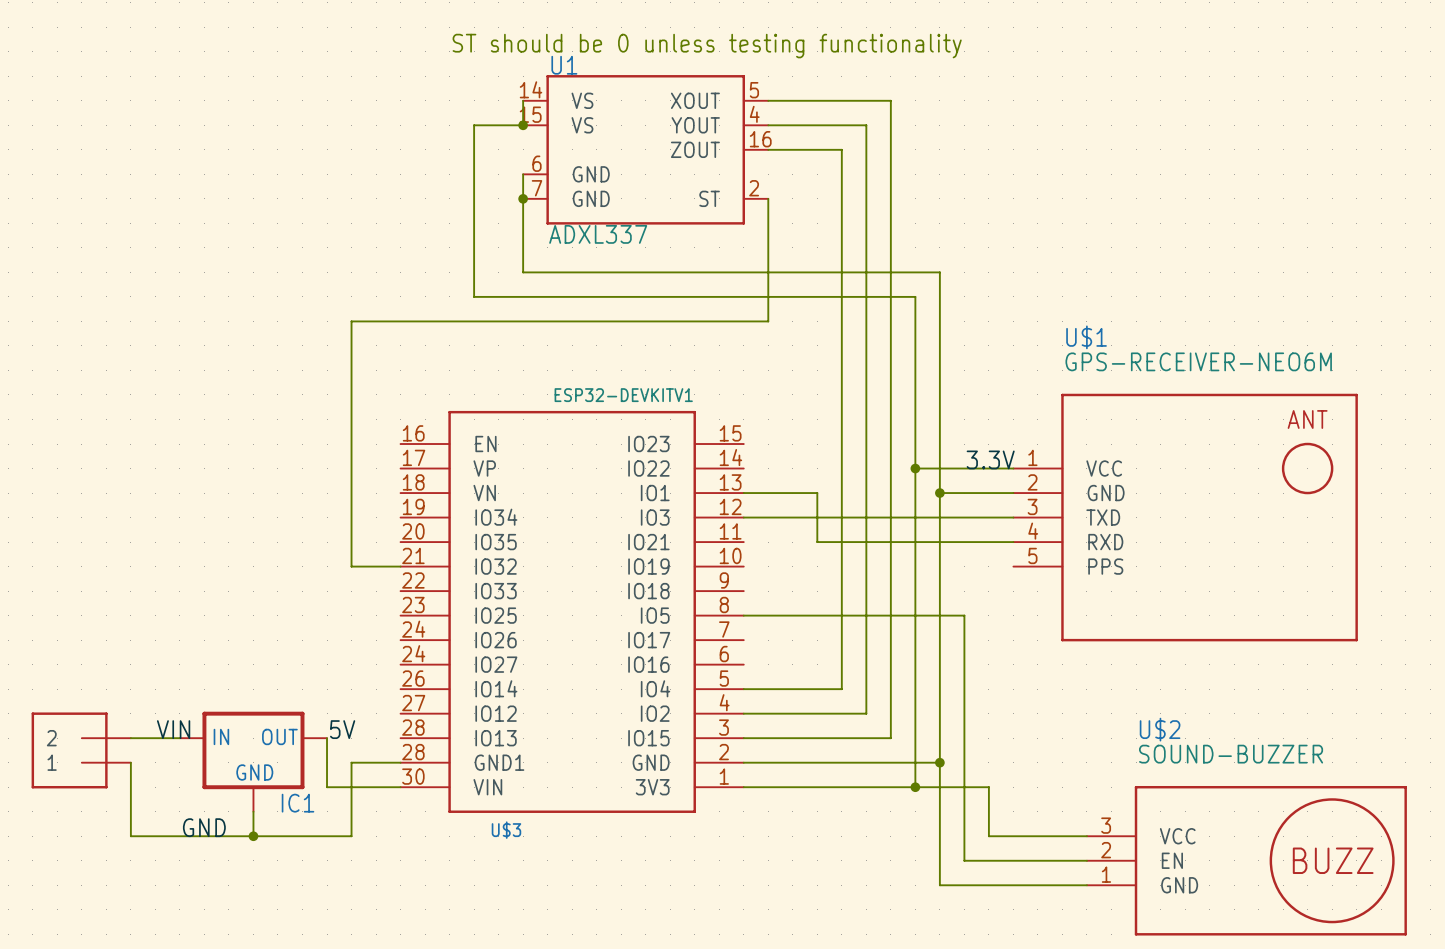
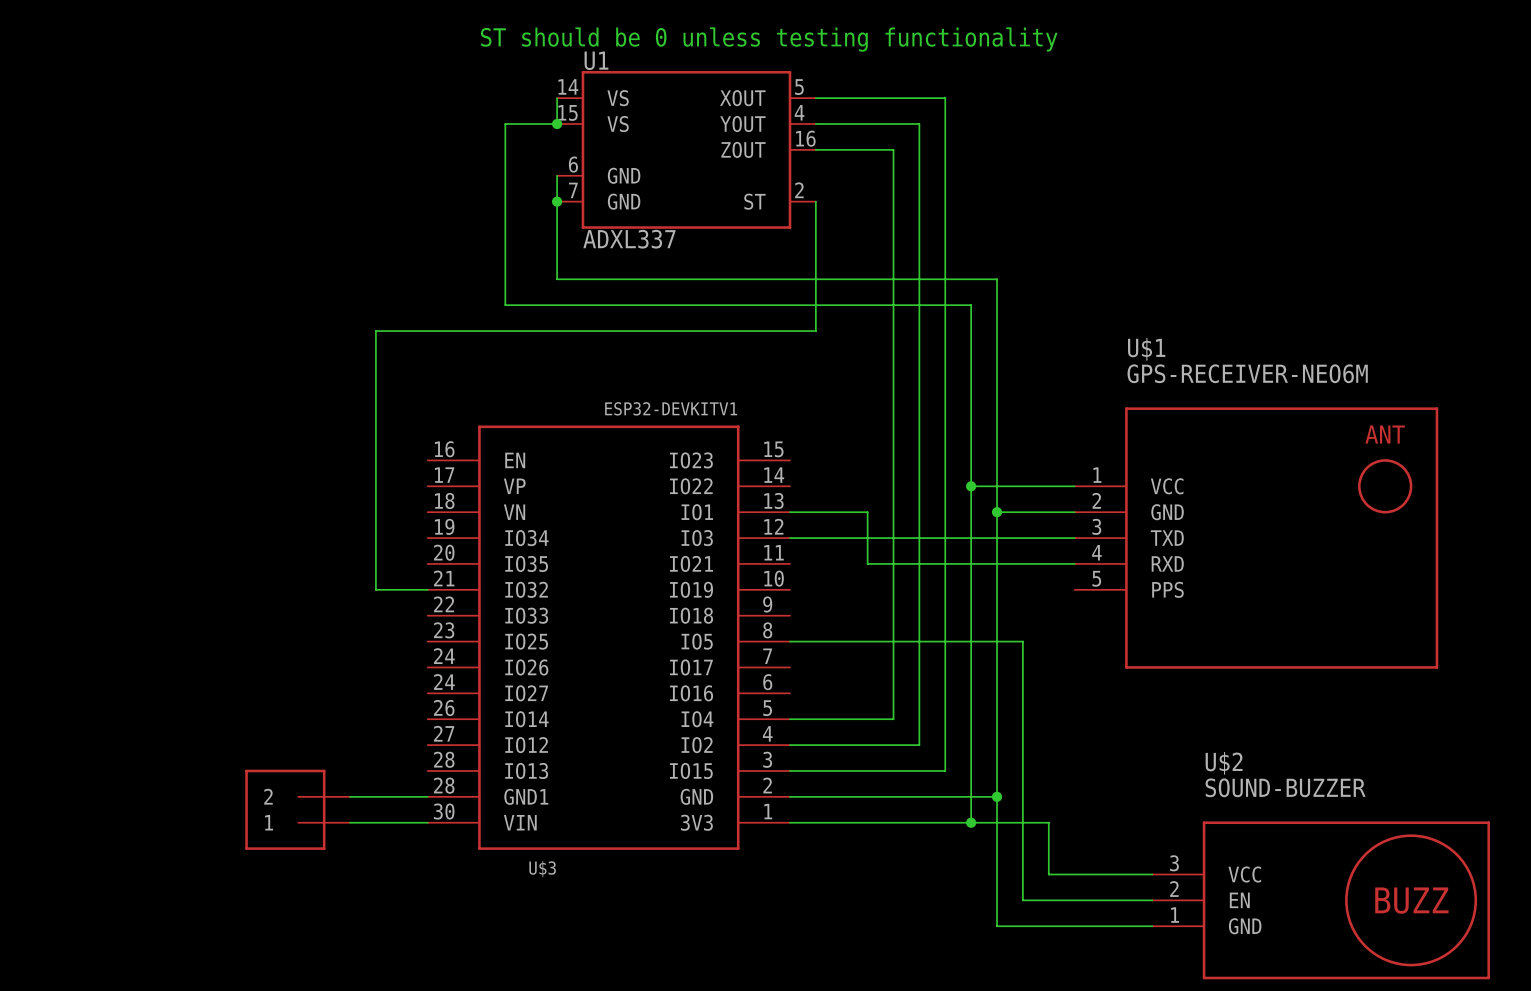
label: 3.3V (990, 459) -> none
label: VIN (173, 729) -> none
label: 5V (342, 729) -> none
wire: (130, 738) (179, 738) -> none
wire: (327, 738) (327, 787) -> none
part position: (81, 750) -> (297, 809)
IC1: (253, 761) -> none
wire: (130, 762) (130, 836) (351, 836) (351, 762) -> (350, 796) (375, 796)
wire: (253, 811) (253, 836) -> none
label: GND (204, 827) -> none
junction: (253, 836) -> none

